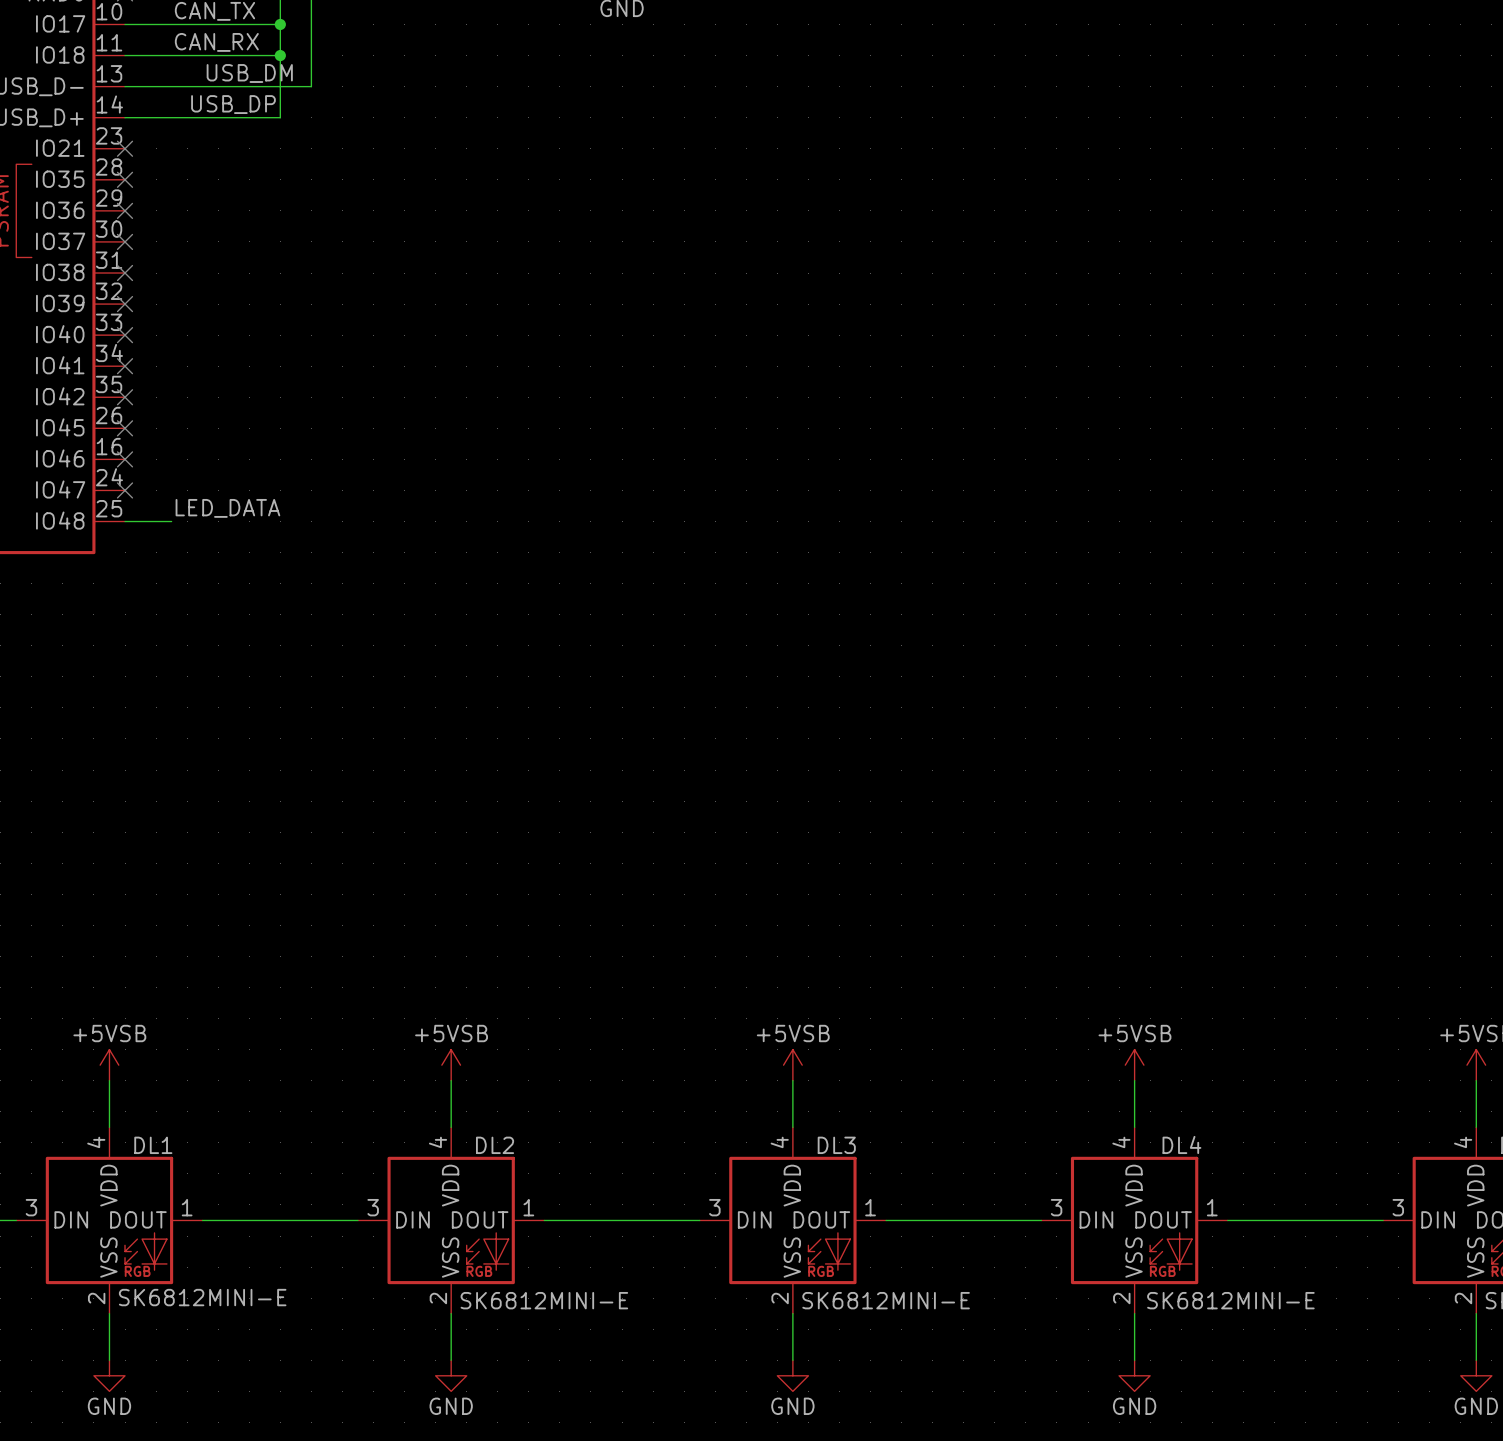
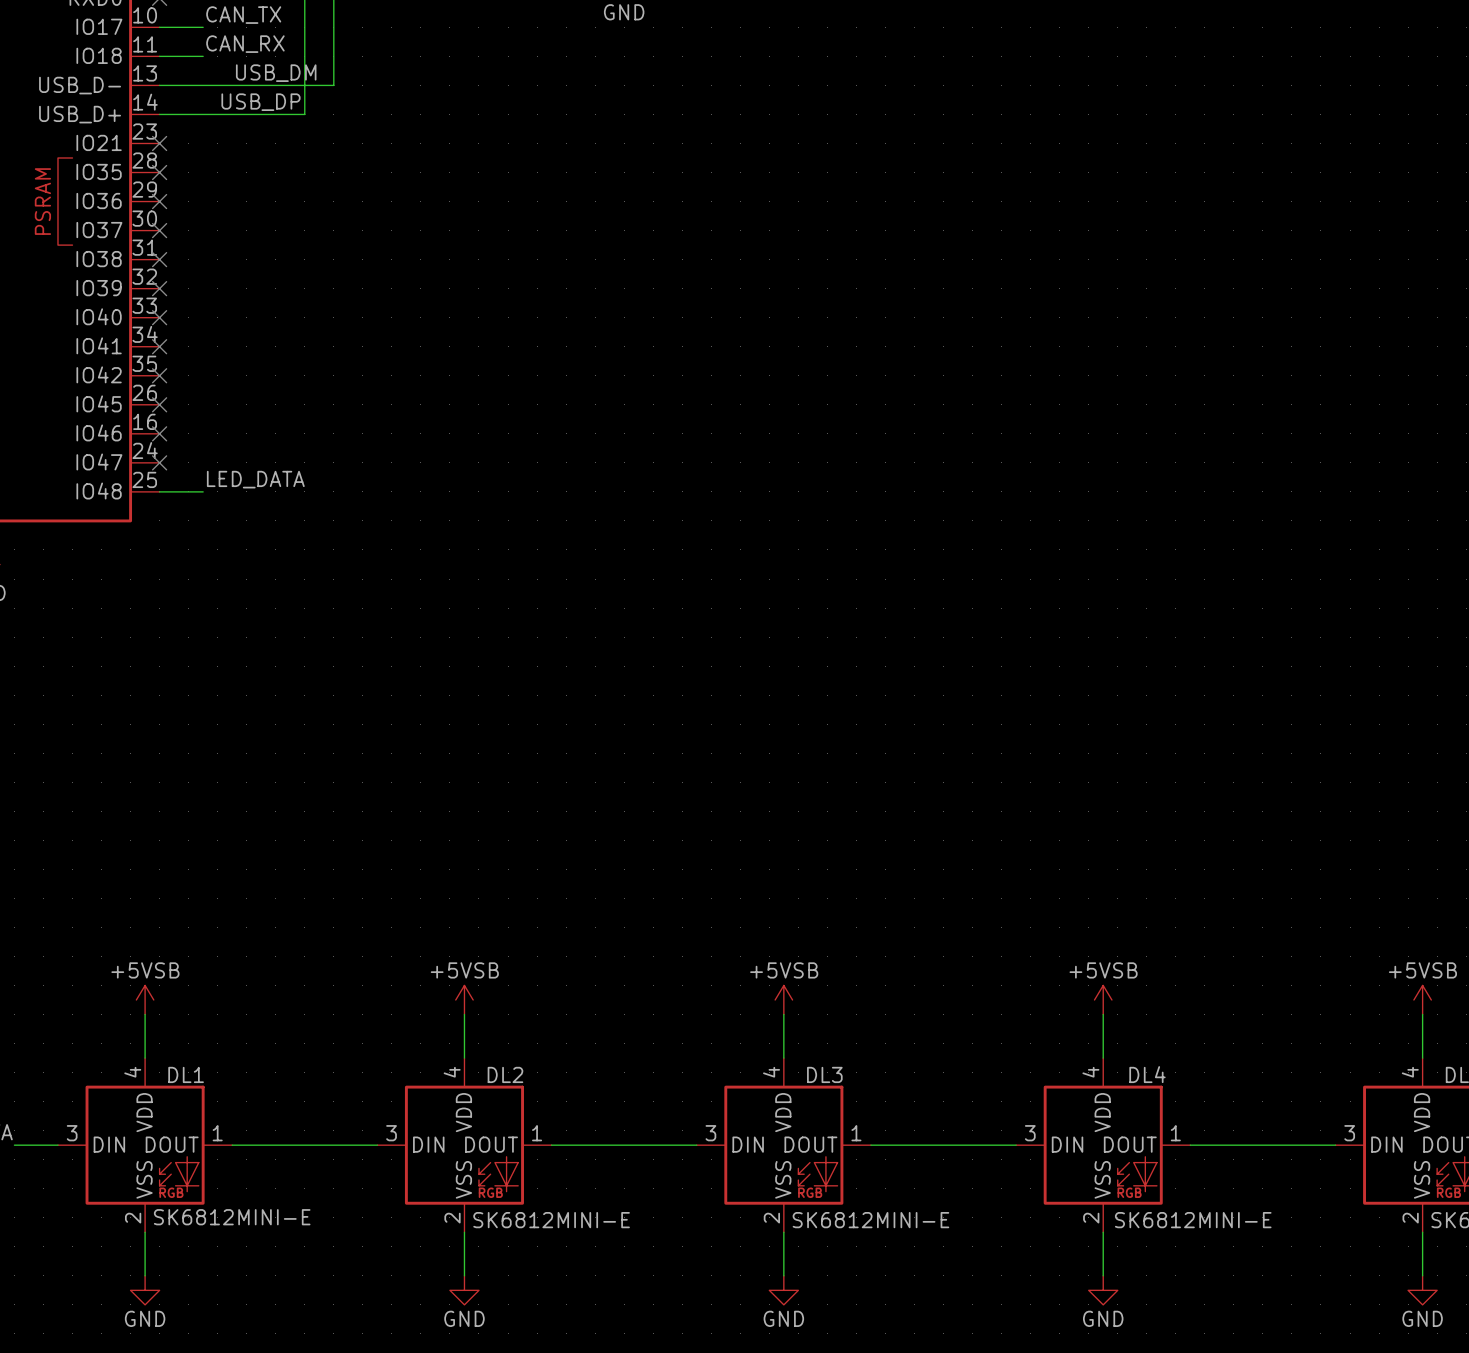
wire: (171, 24) (280, 24) -> none
junction: (280, 24) -> none
wire: (171, 55) (280, 55) -> none
junction: (280, 55) -> none

